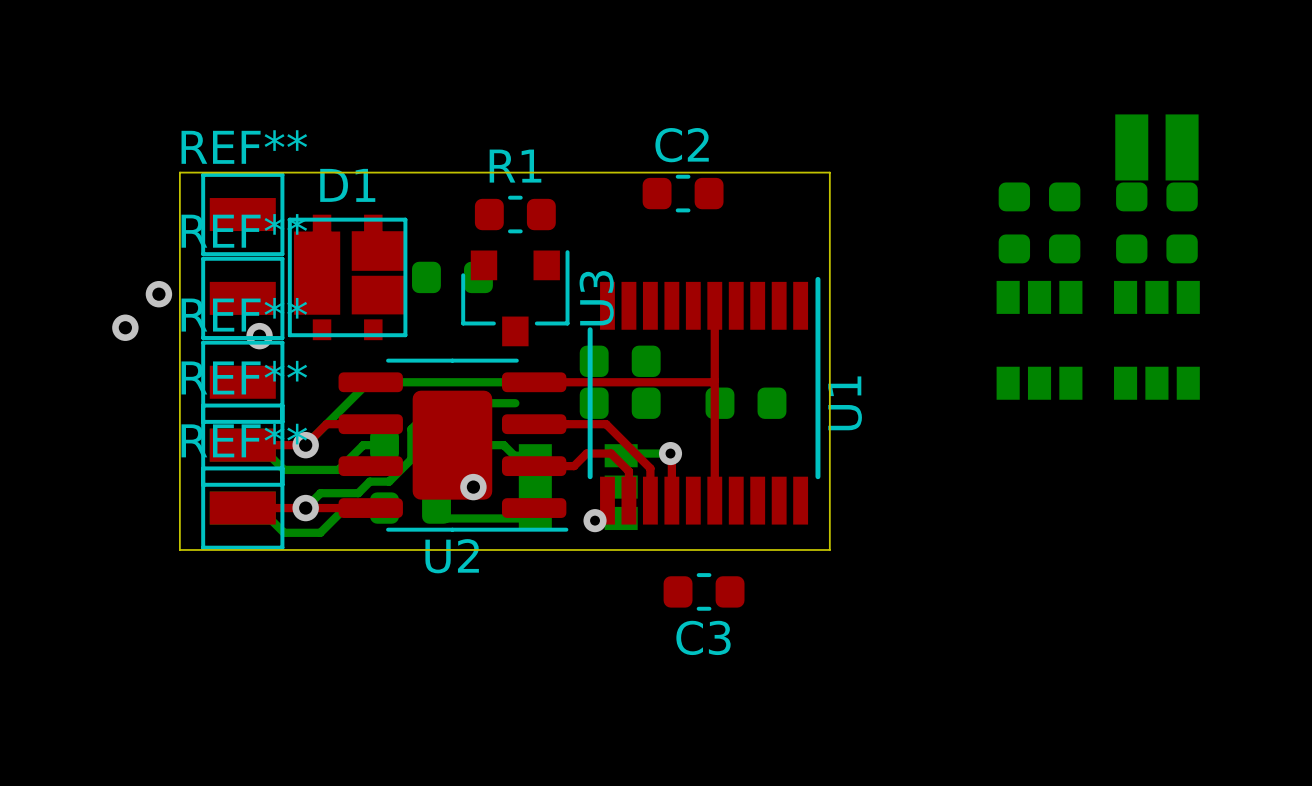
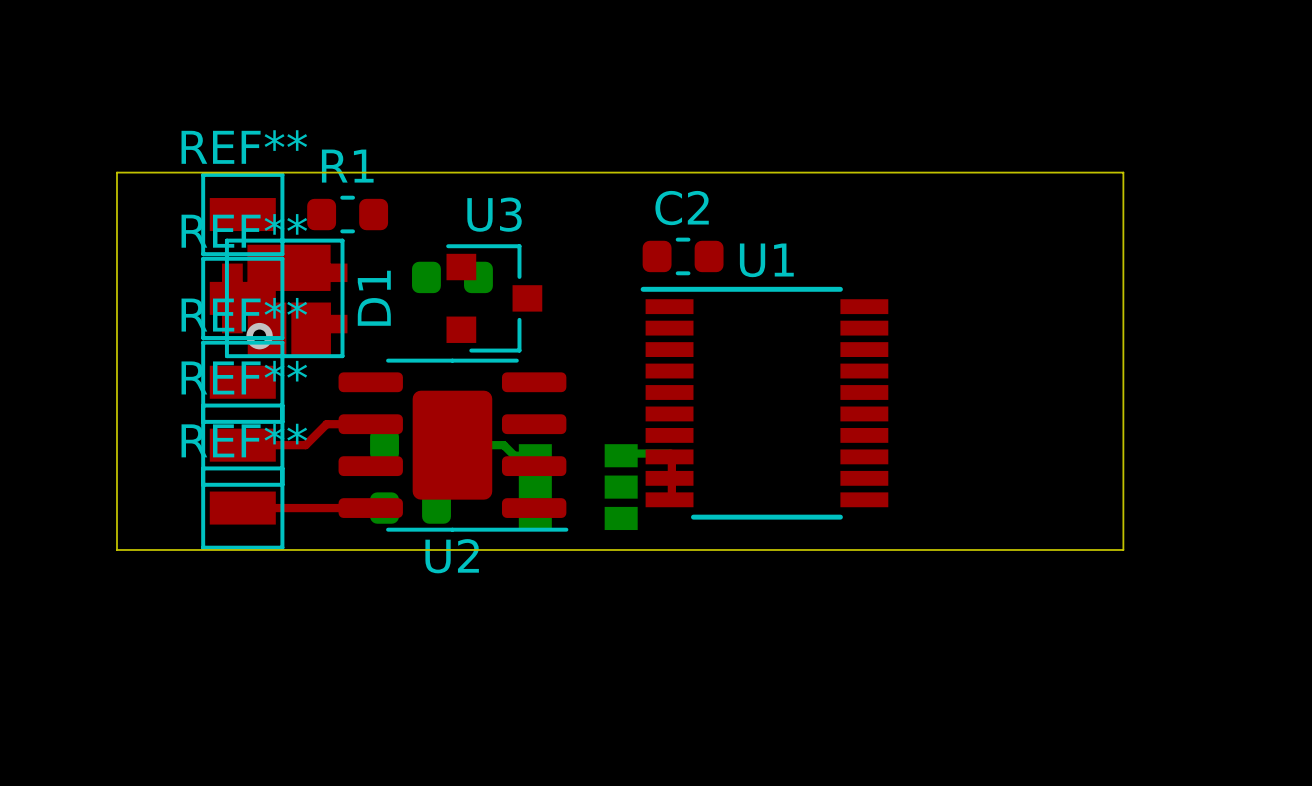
part: (1131, 147) -> none
part: (1182, 147) -> none
board edge: (179, 172) (179, 549) -> (179, 172) (116, 172) (116, 549) (179, 549)
board edge: (829, 172) (829, 549) -> (829, 172) (1123, 172) (1123, 549) (829, 549)
C2 position: (683, 193) -> (683, 256)
R1 position: (515, 214) -> (347, 214)
part: (1014, 222) -> none
part: (1064, 222) -> none
part: (1131, 222) -> none
part: (1182, 222) -> none
D1 rotation: 0° (347, 277) -> 90° clockwise (284, 298)
via: (158, 294) -> none
U3 rotation: 0° (515, 298) -> 90° counterclockwise (494, 298)
top track: (714, 305) (714, 500) -> none
via: (125, 327) -> none
part: (1039, 340) -> none
part: (1156, 340) -> none
part: (620, 361) -> none
top track: (714, 380) (712, 382) (534, 382) -> none
bottom track: (515, 382) (368, 382) (305, 445) -> none
U1 rotation: 0° (704, 400) -> 90° counterclockwise (764, 403)
bottom track: (515, 403) (437, 403) (411, 429) (411, 459) (389, 481) (369, 481) (358, 493) (320, 493) (305, 508) -> none
part: (620, 403) -> none
part: (745, 403) -> none
top track: (534, 424) (606, 424) (650, 468) (650, 500) -> none
bottom track: (242, 445) (259, 445) (284, 469) (338, 469) (363, 445) (384, 445) -> none
via: (305, 445) -> none
via: (670, 453) -> none
top track: (534, 466) (574, 466) (586, 453) (611, 453) (628, 471) (628, 500) -> none
via: (473, 487) -> none
bottom track: (242, 508) (259, 508) (284, 532) (320, 532) (345, 508) (384, 508) -> none
via: (305, 508) -> none
bottom track: (436, 508) (446, 518) (536, 518) -> none
via: (595, 520) -> none
C3: (704, 591) -> none

